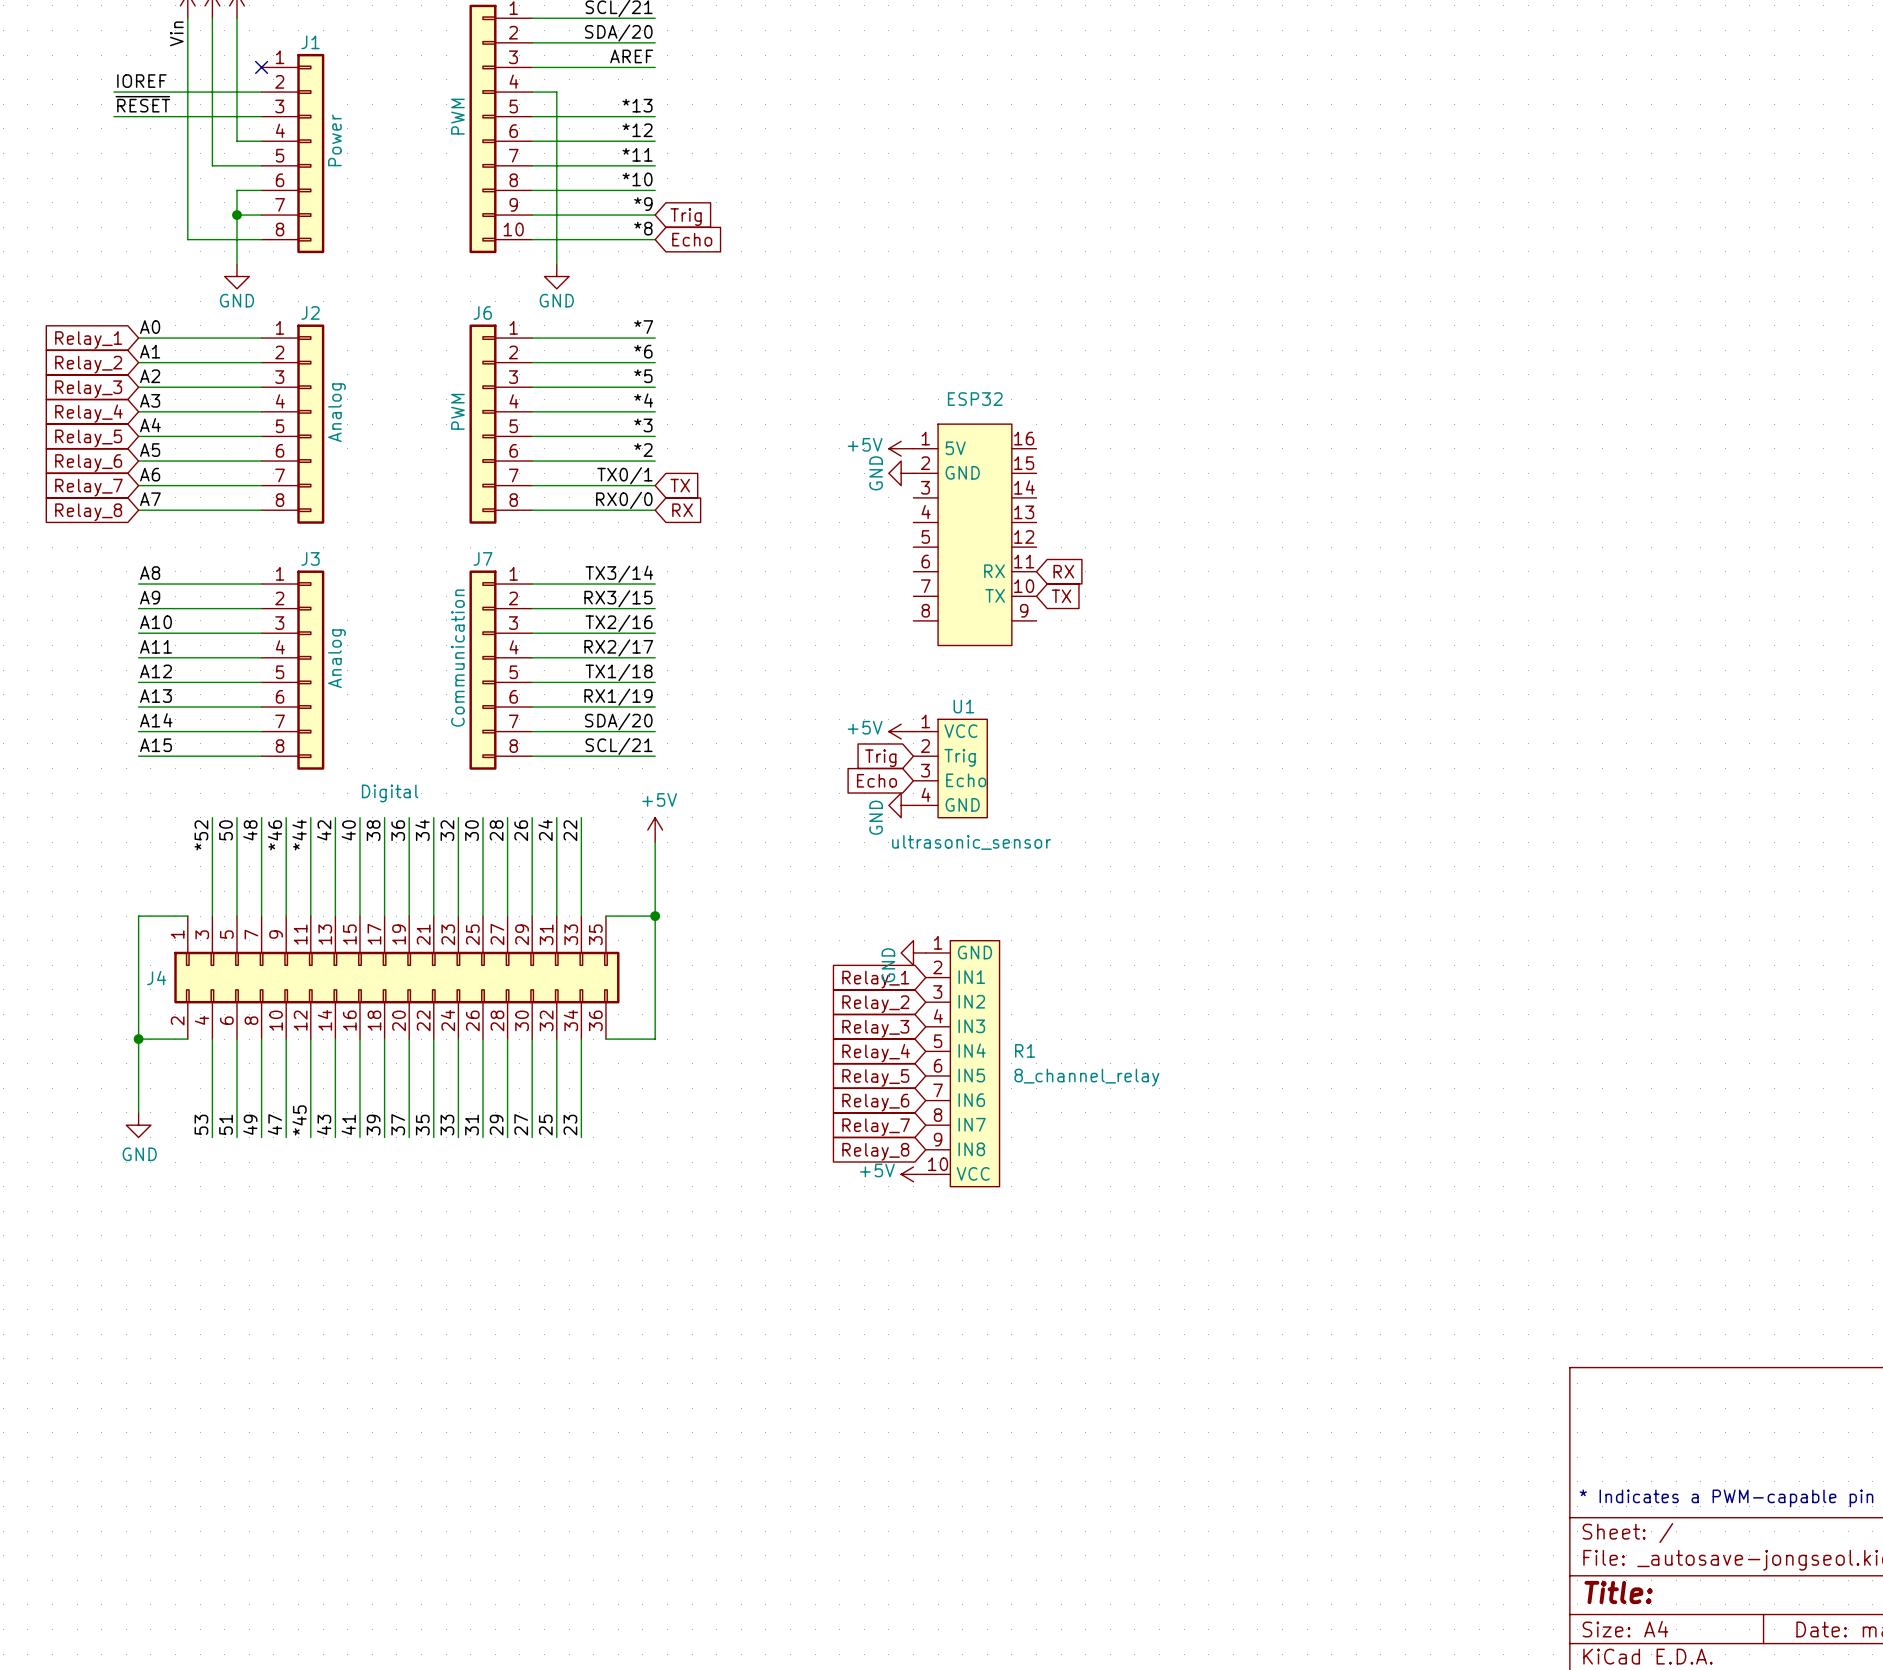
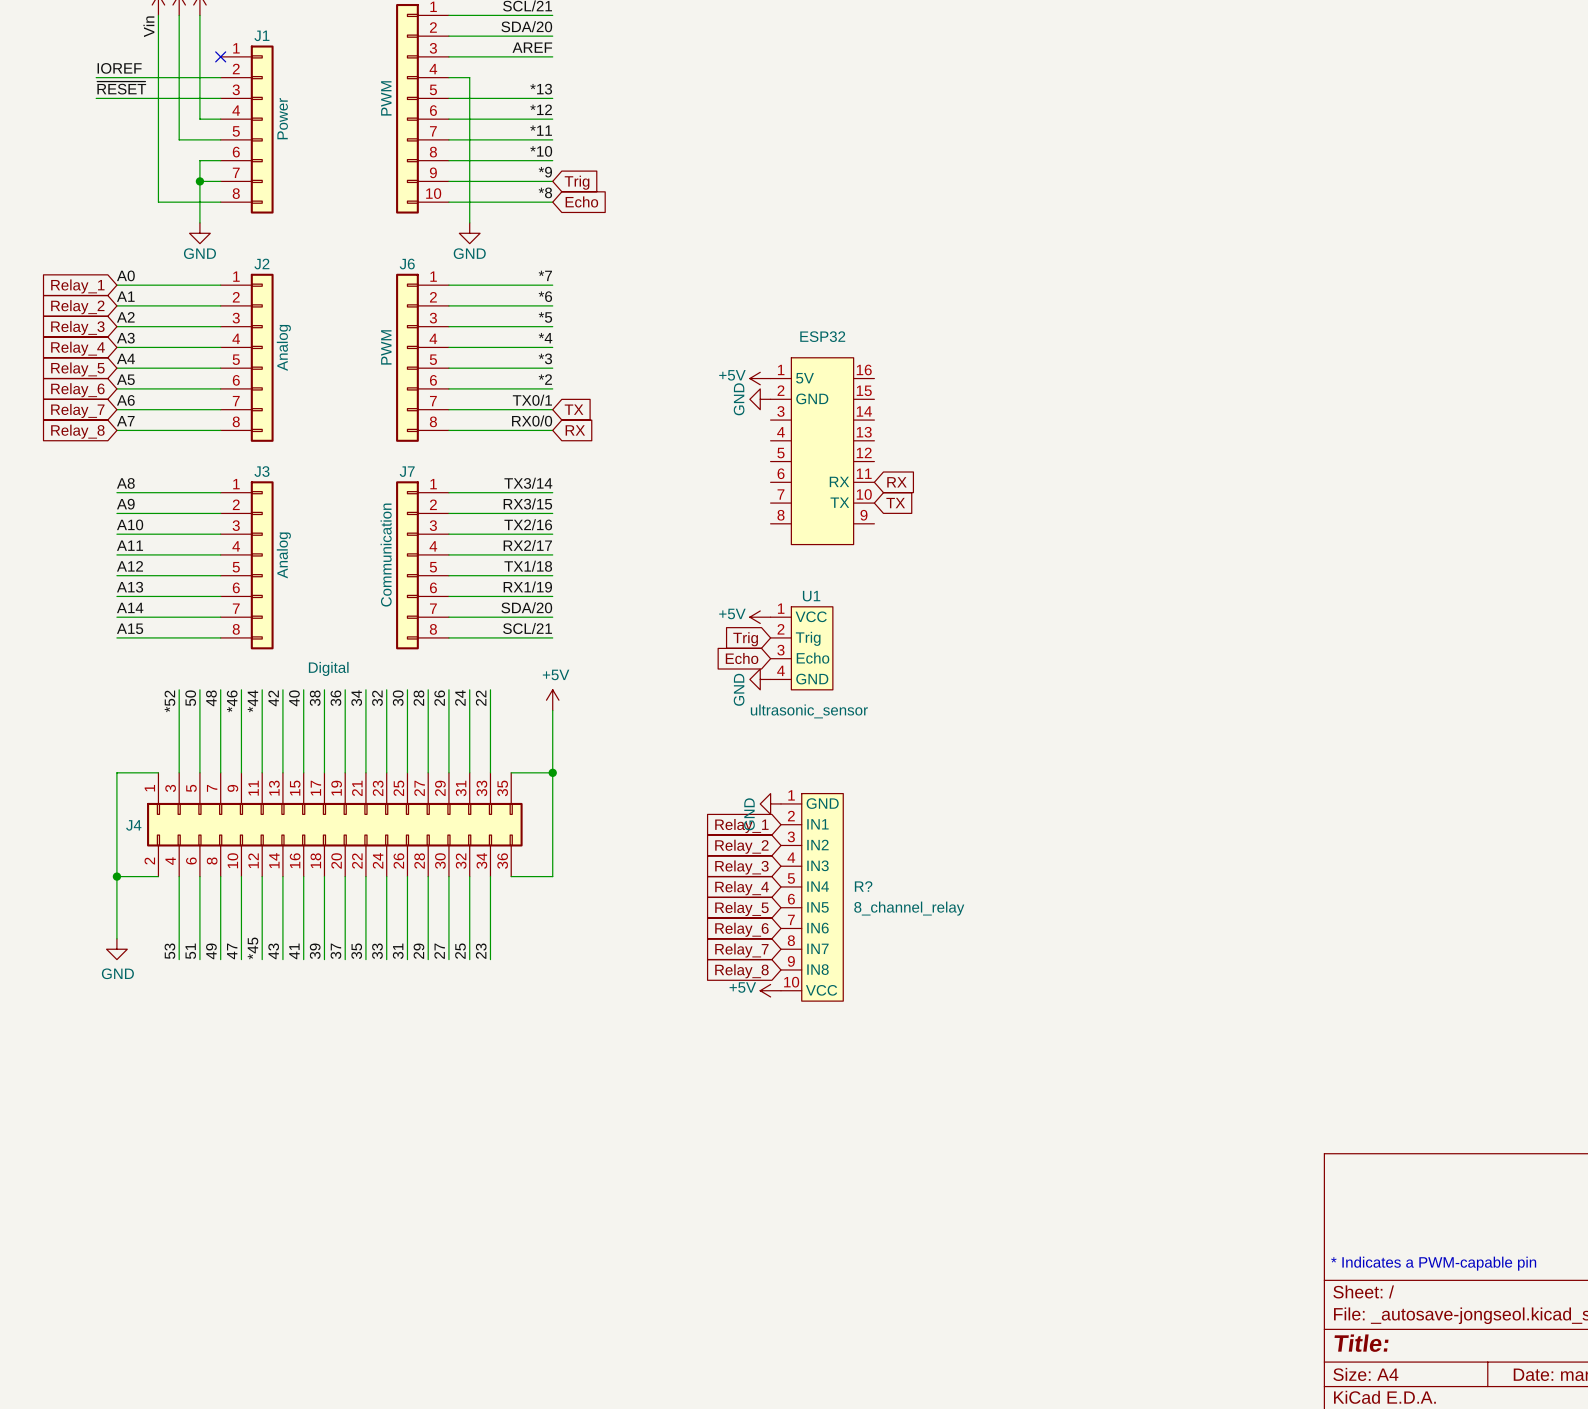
R1 name: R1 (1025, 1050) -> R? (863, 886)

